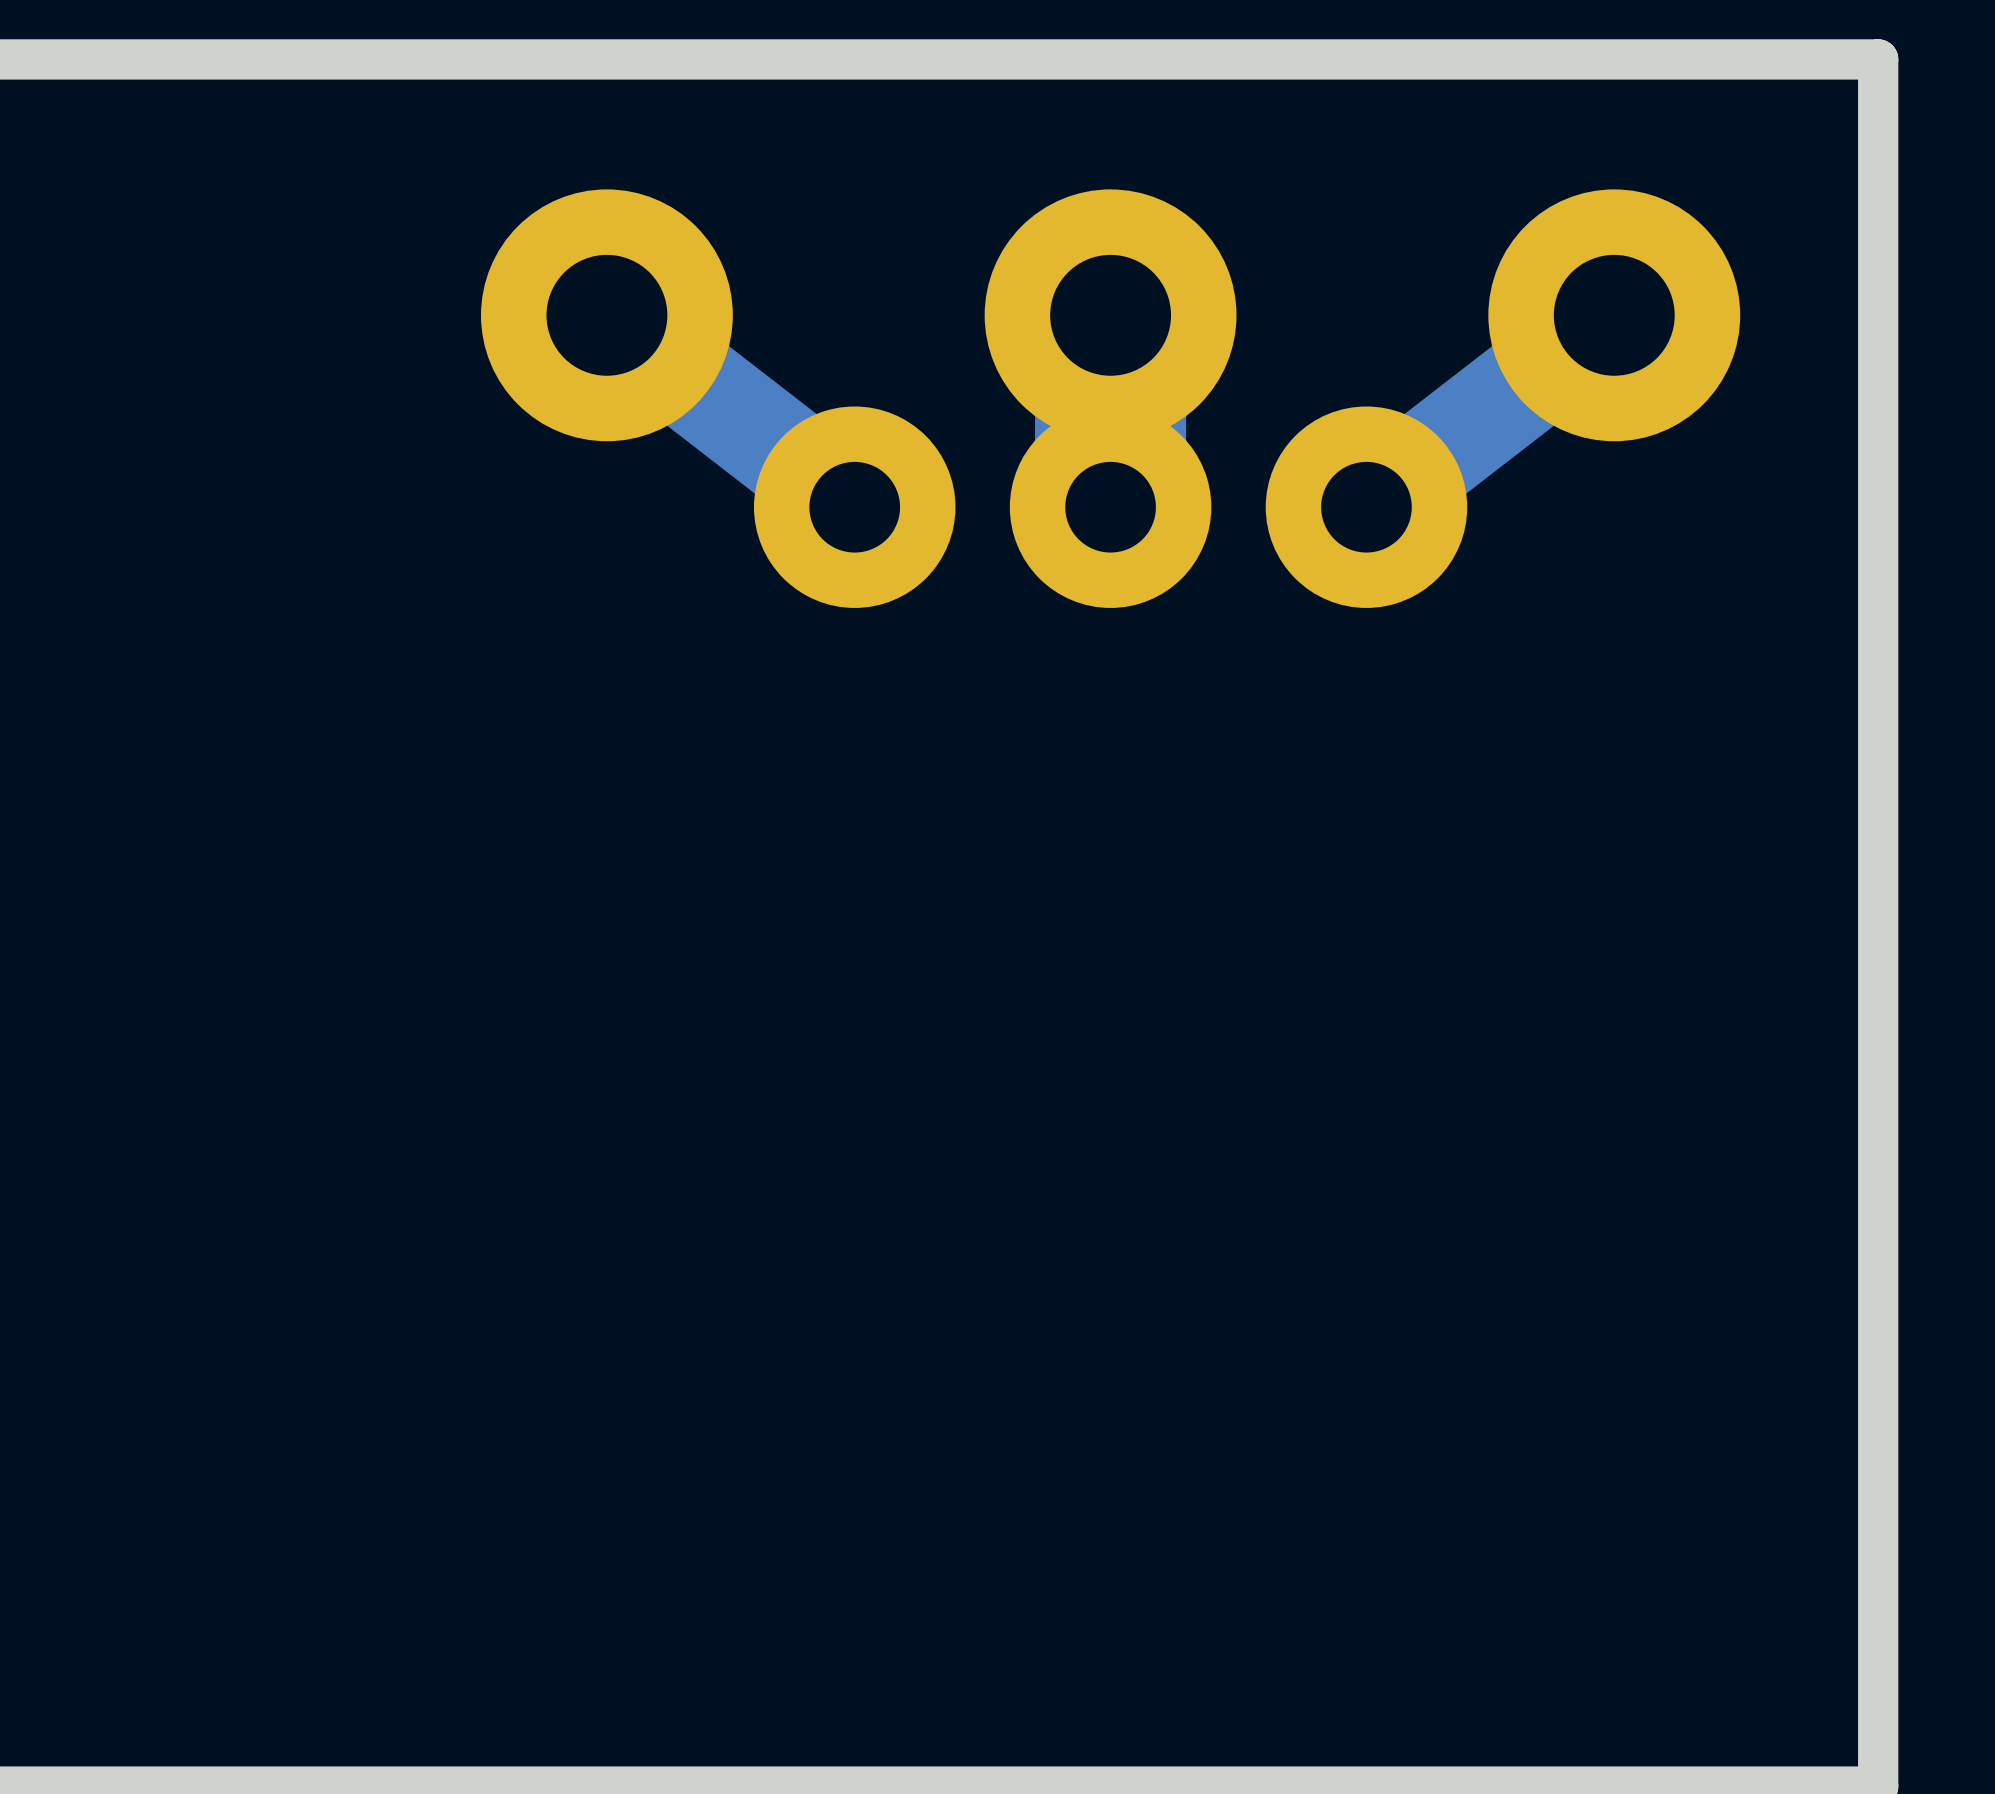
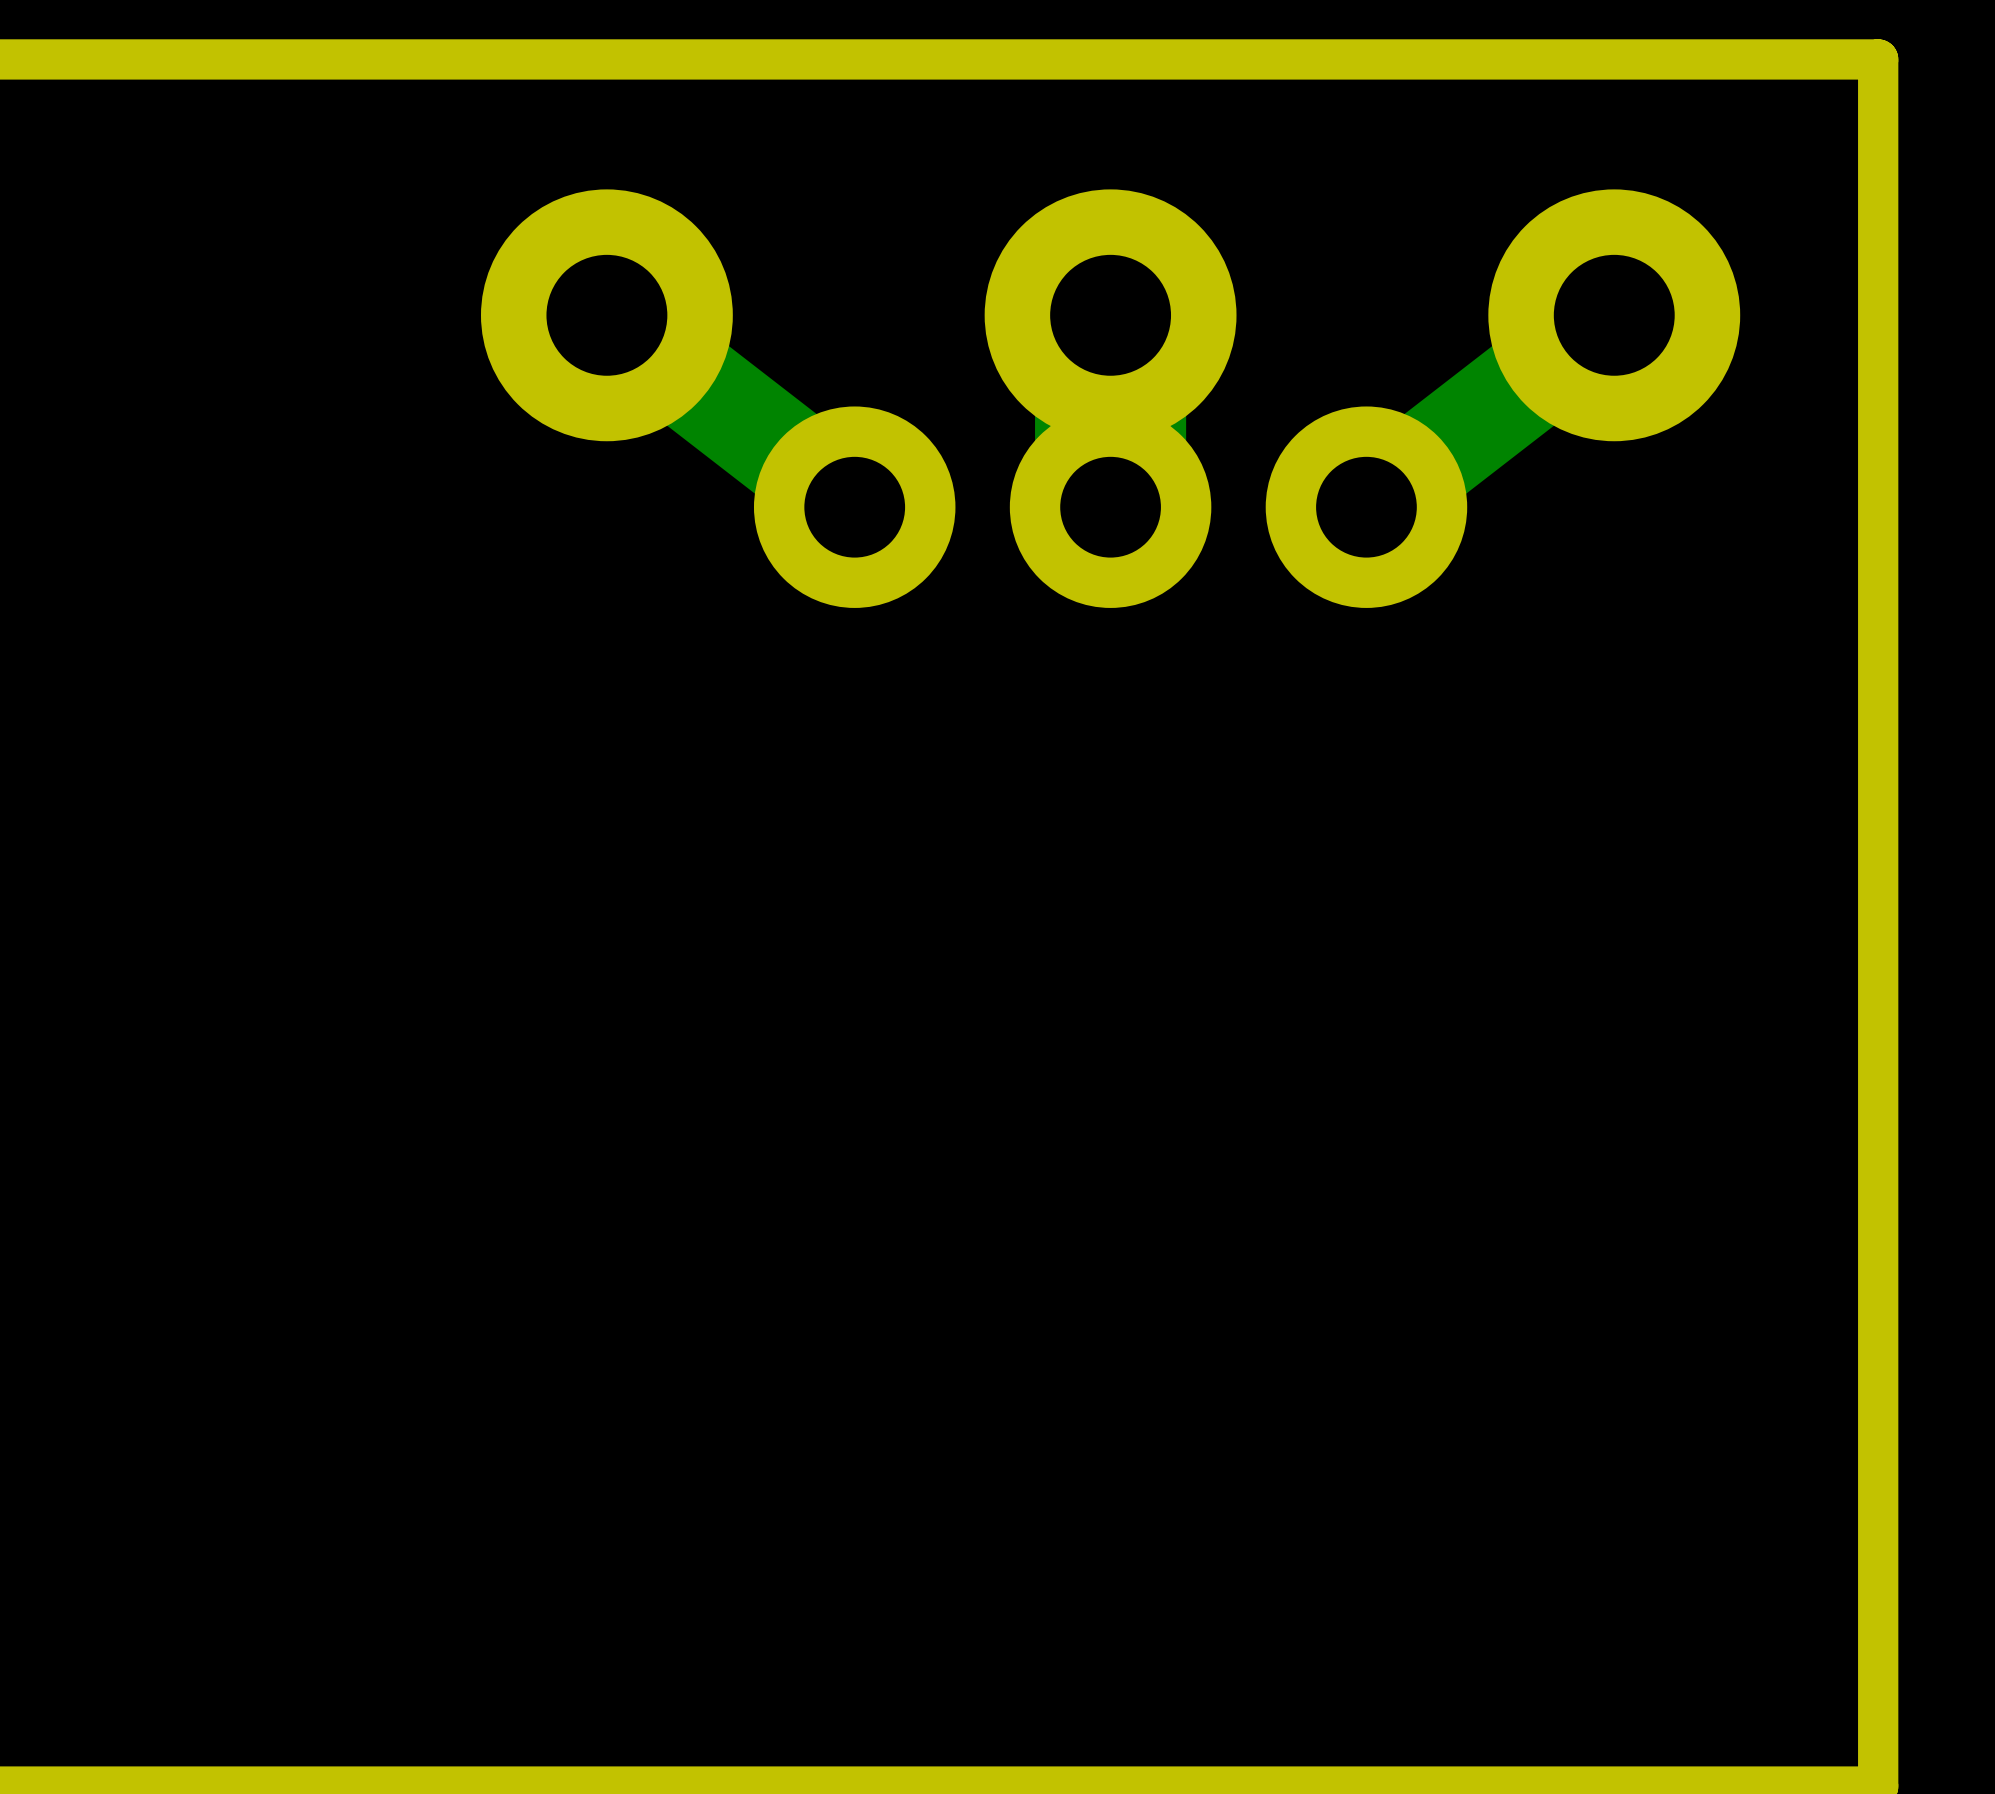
part footprint: [753, 406, 1468, 608] -> [753, 406, 1468, 608]

